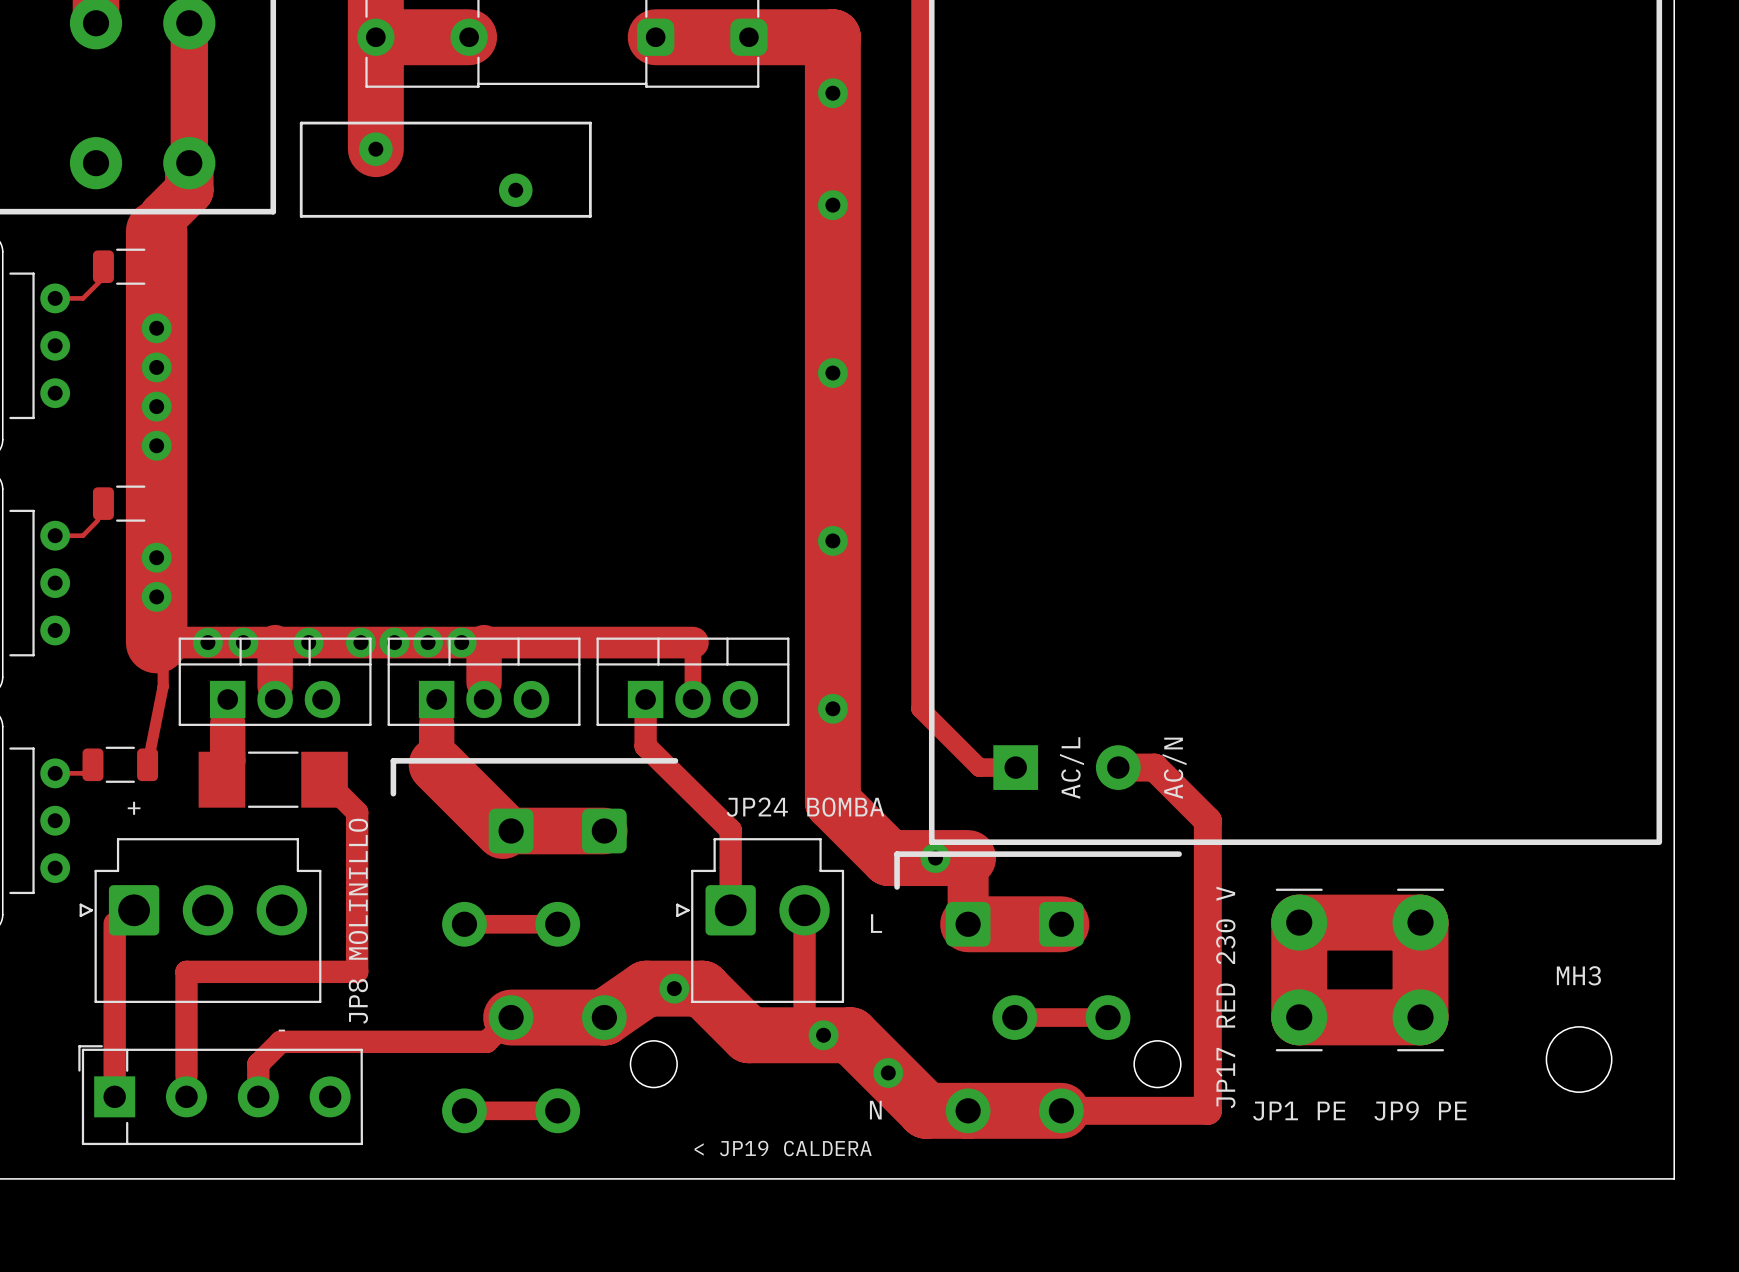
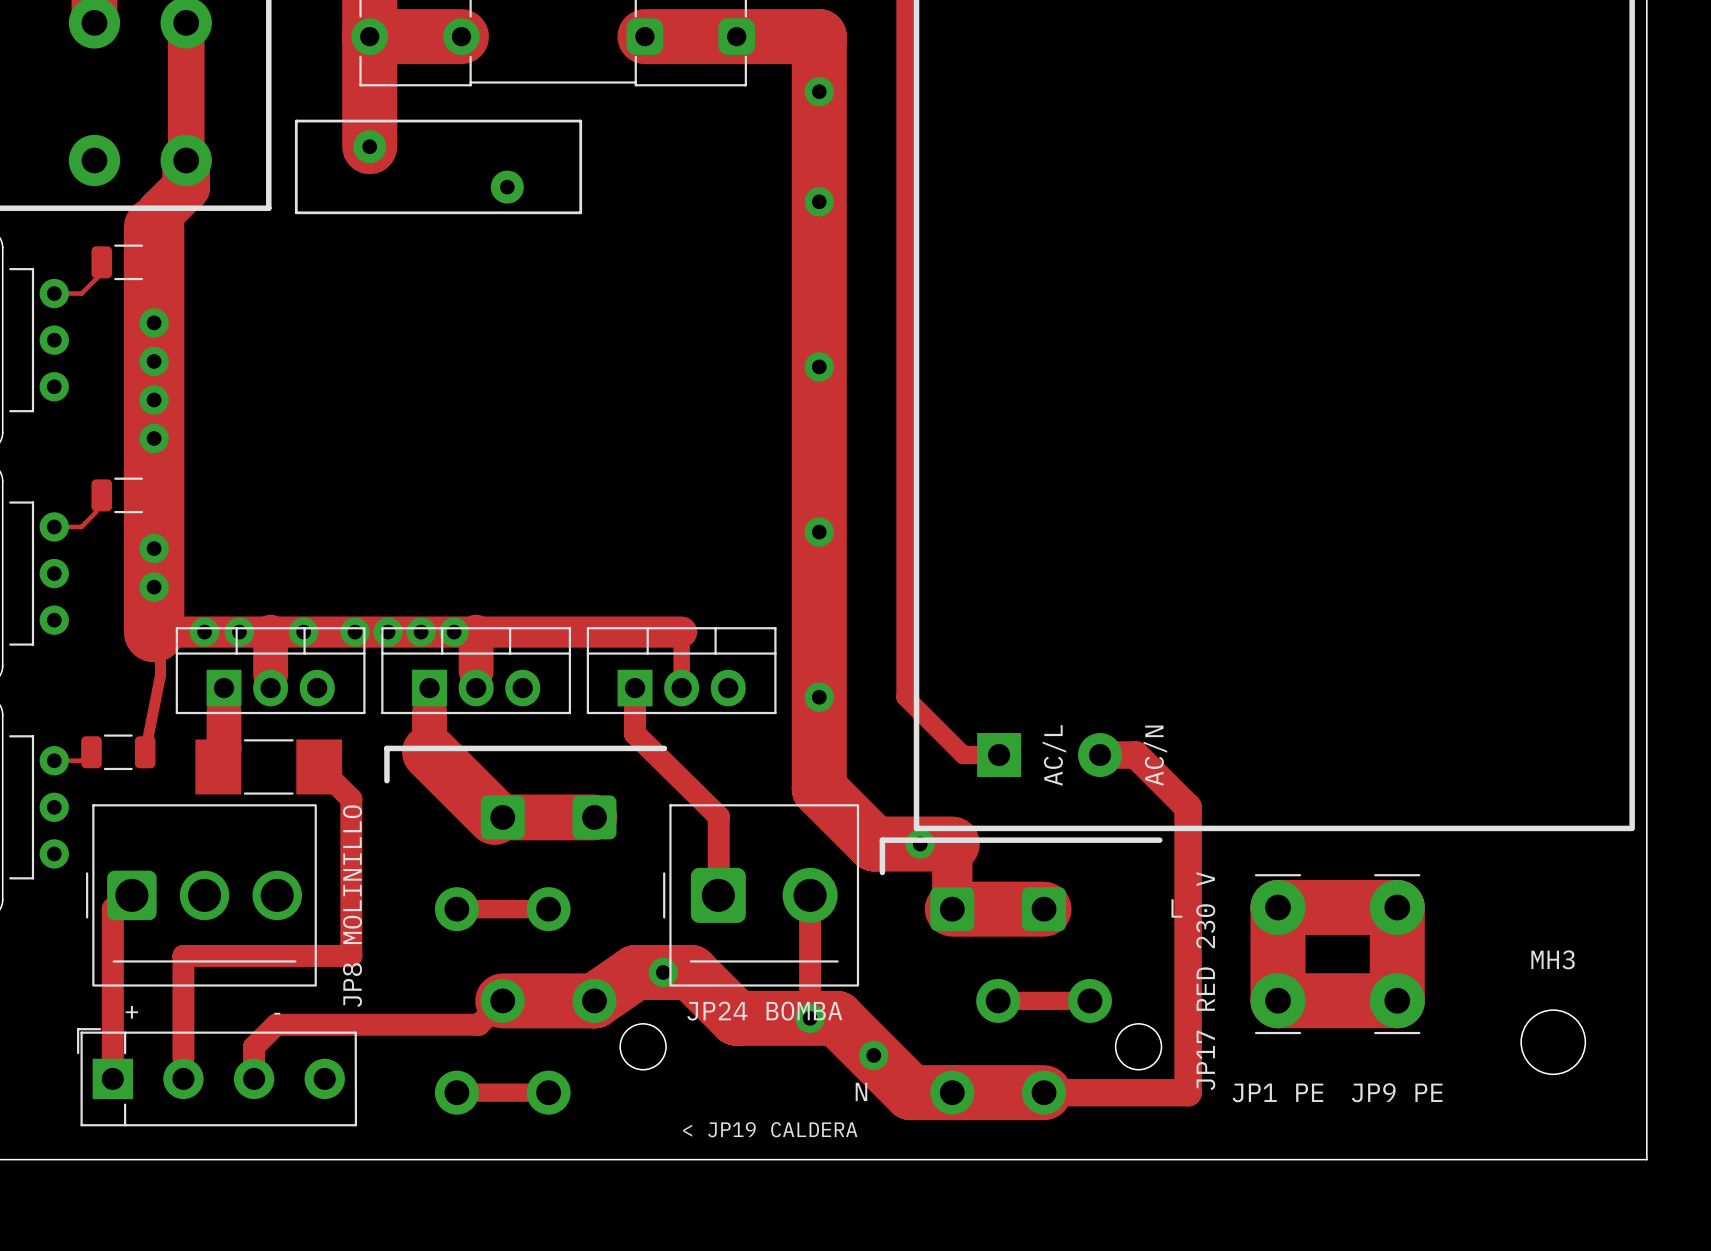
text position: JP24 BOMBA (805, 807) -> JP24 BOMBA (764, 1011)
text position: + (134, 808) -> + (131, 1012)
part footprint: [79, 838, 322, 1004] -> [86, 804, 317, 987]
part footprint: [676, 838, 845, 1004] -> [663, 804, 860, 987]
track: (804, 910) (804, 1035) -> none
text position: L (876, 923) -> L (1176, 908)
track: none -> (810, 910) (810, 1018)

